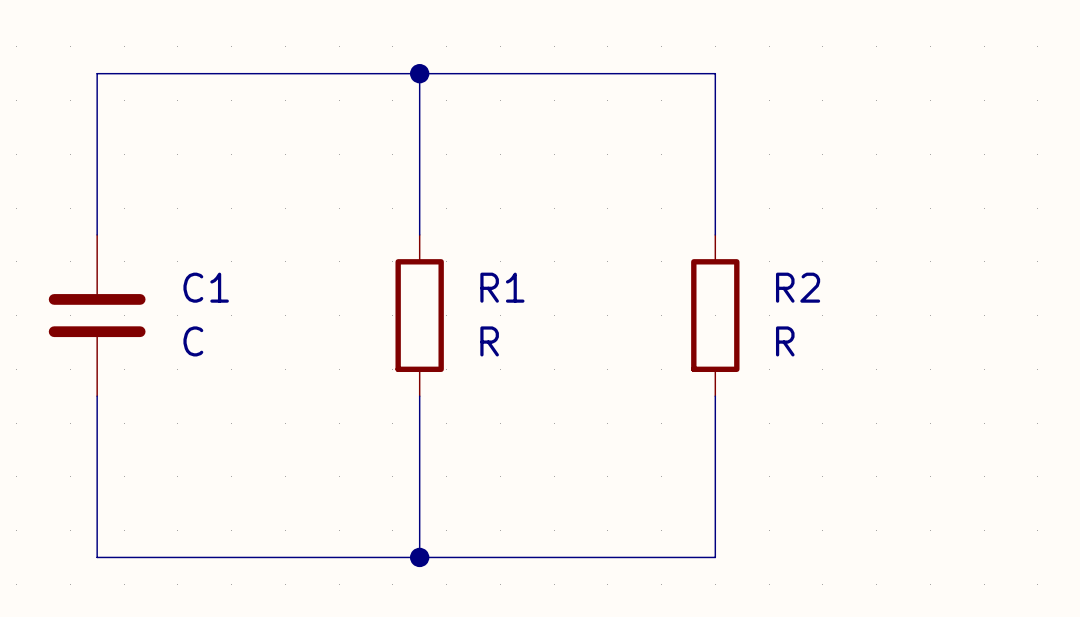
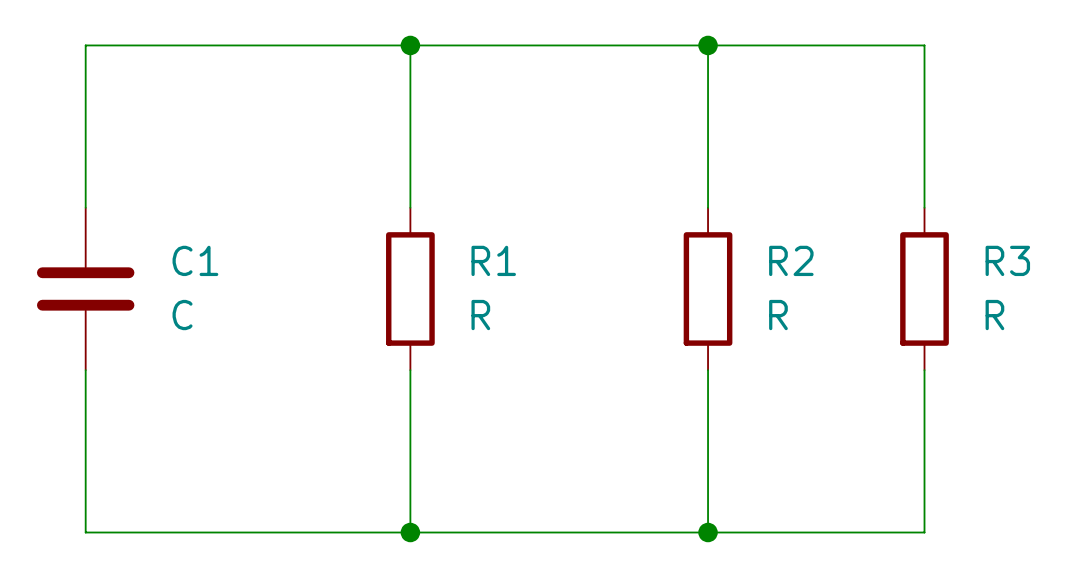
wire: none -> (708, 45) (924, 45) (924, 207)
junction: none -> (708, 45)
R3: none -> R (924, 288)
wire: none -> (924, 370) (924, 532) (708, 532)
junction: none -> (708, 532)

